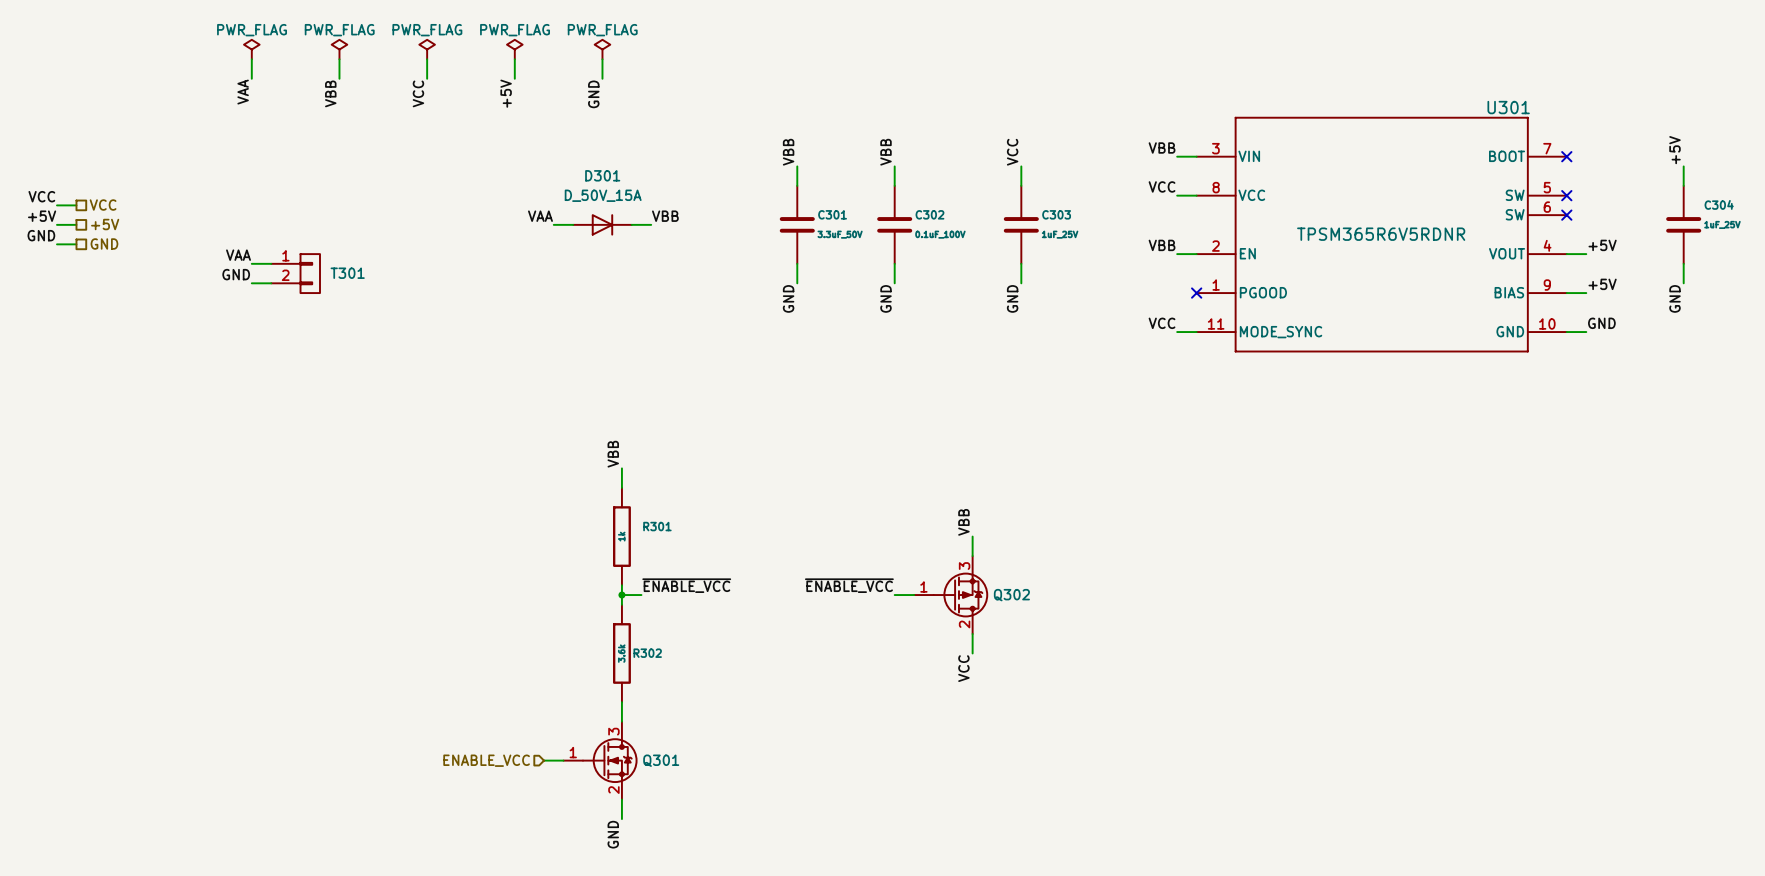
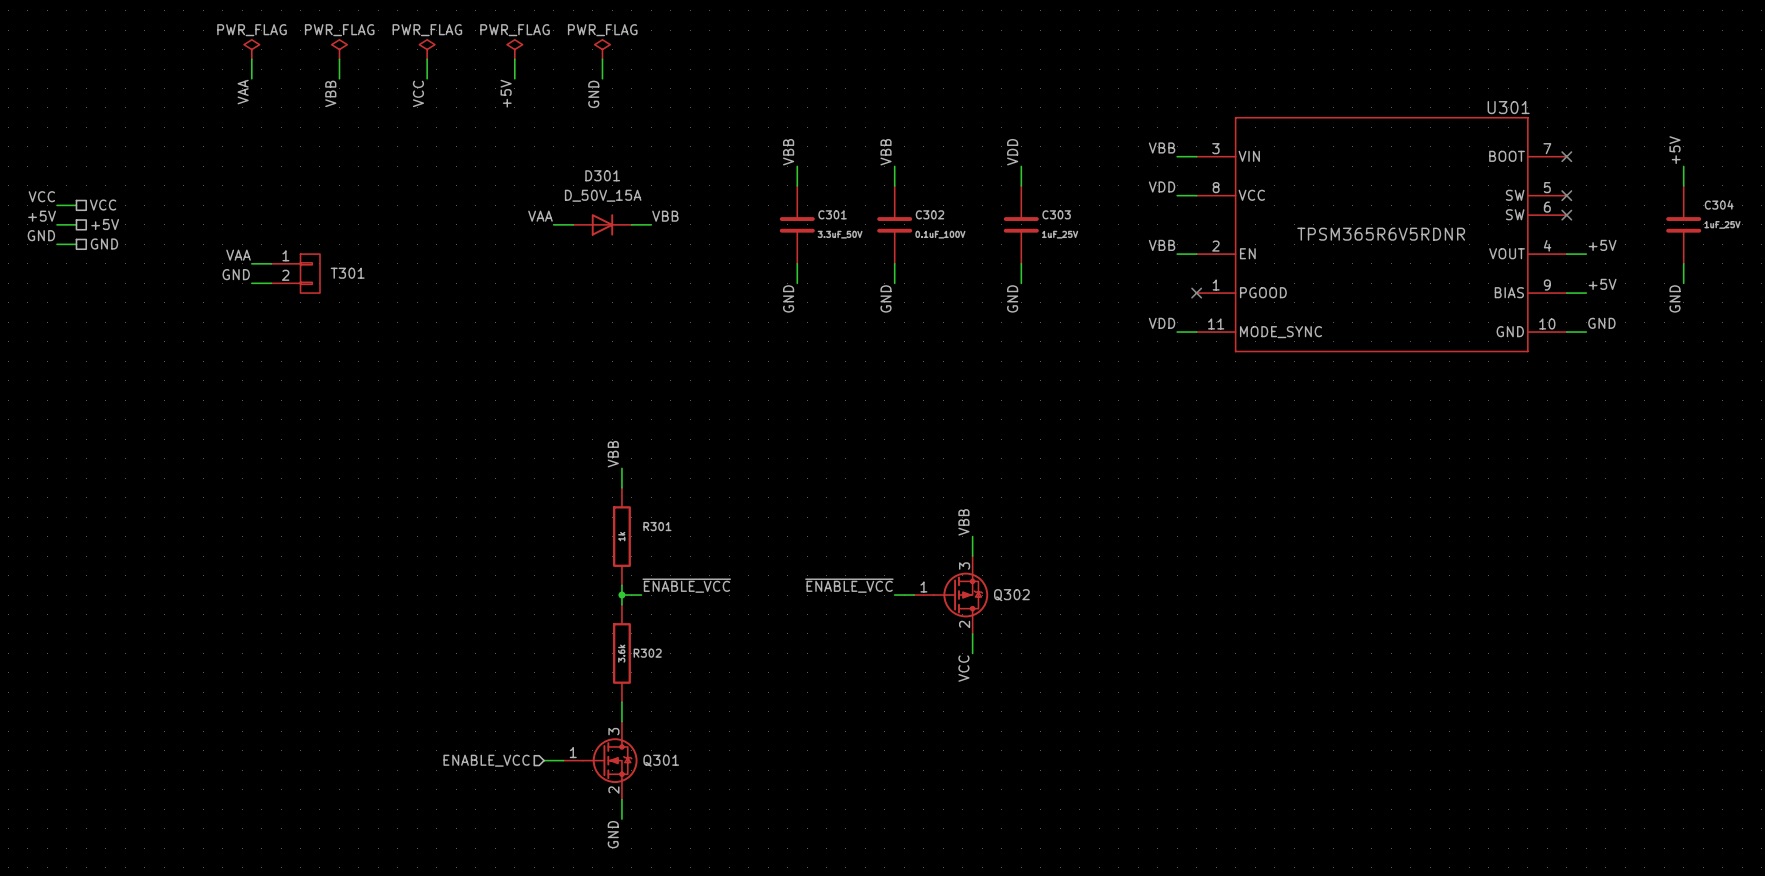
label: VCC (1012, 152) -> VDD (1012, 152)
label: VCC (1162, 186) -> VDD (1162, 186)
label: VCC (1162, 323) -> VDD (1162, 323)

